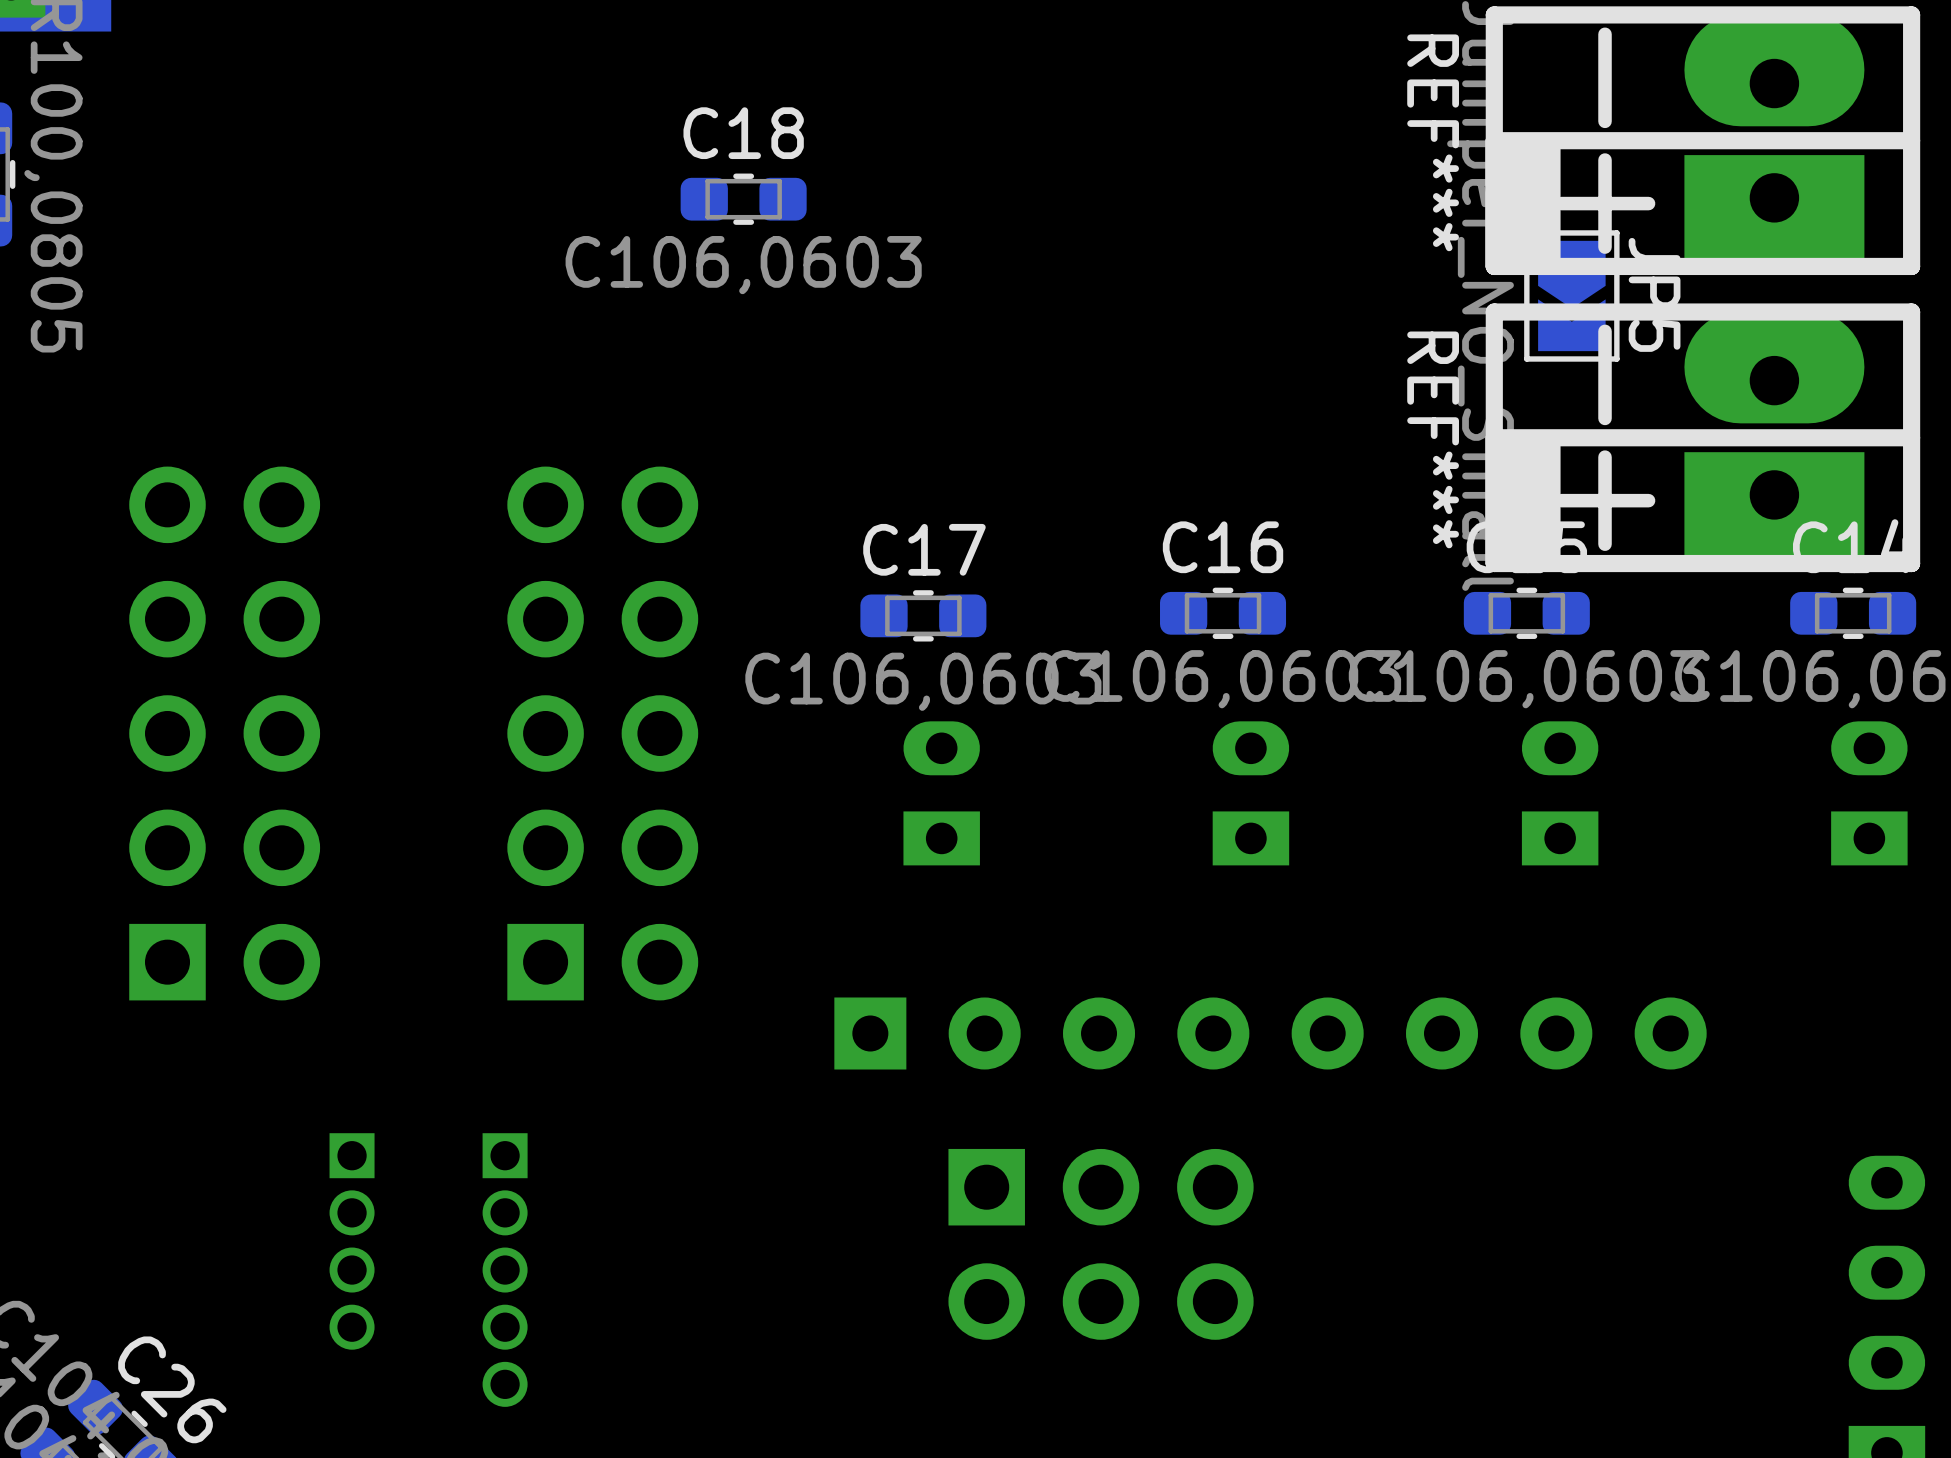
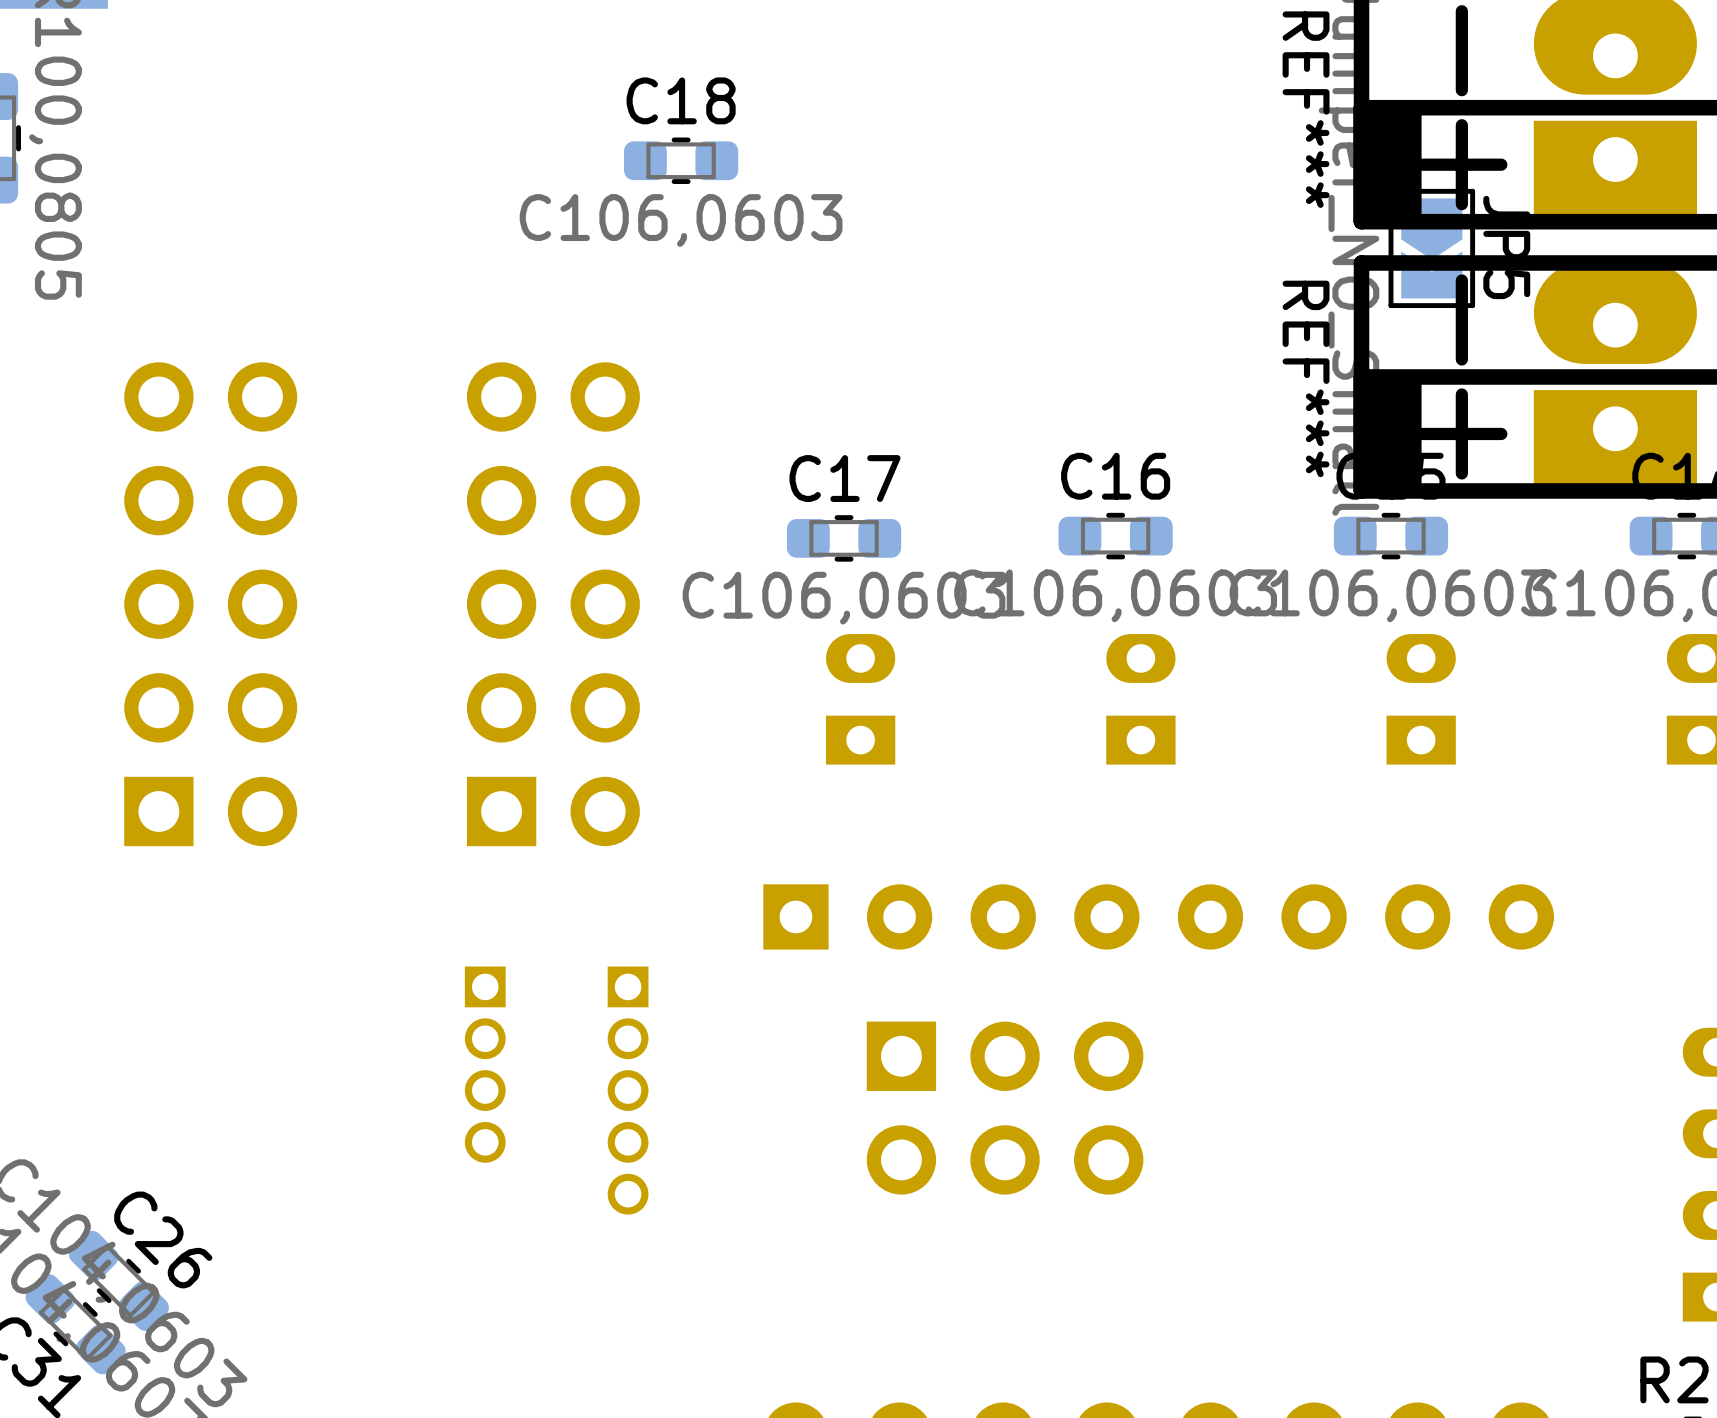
part position: (224, 733) -> (210, 604)
part position: (602, 733) -> (553, 604)
part position: (352, 1241) -> (485, 1064)
part position: (505, 1270) -> (628, 1090)

